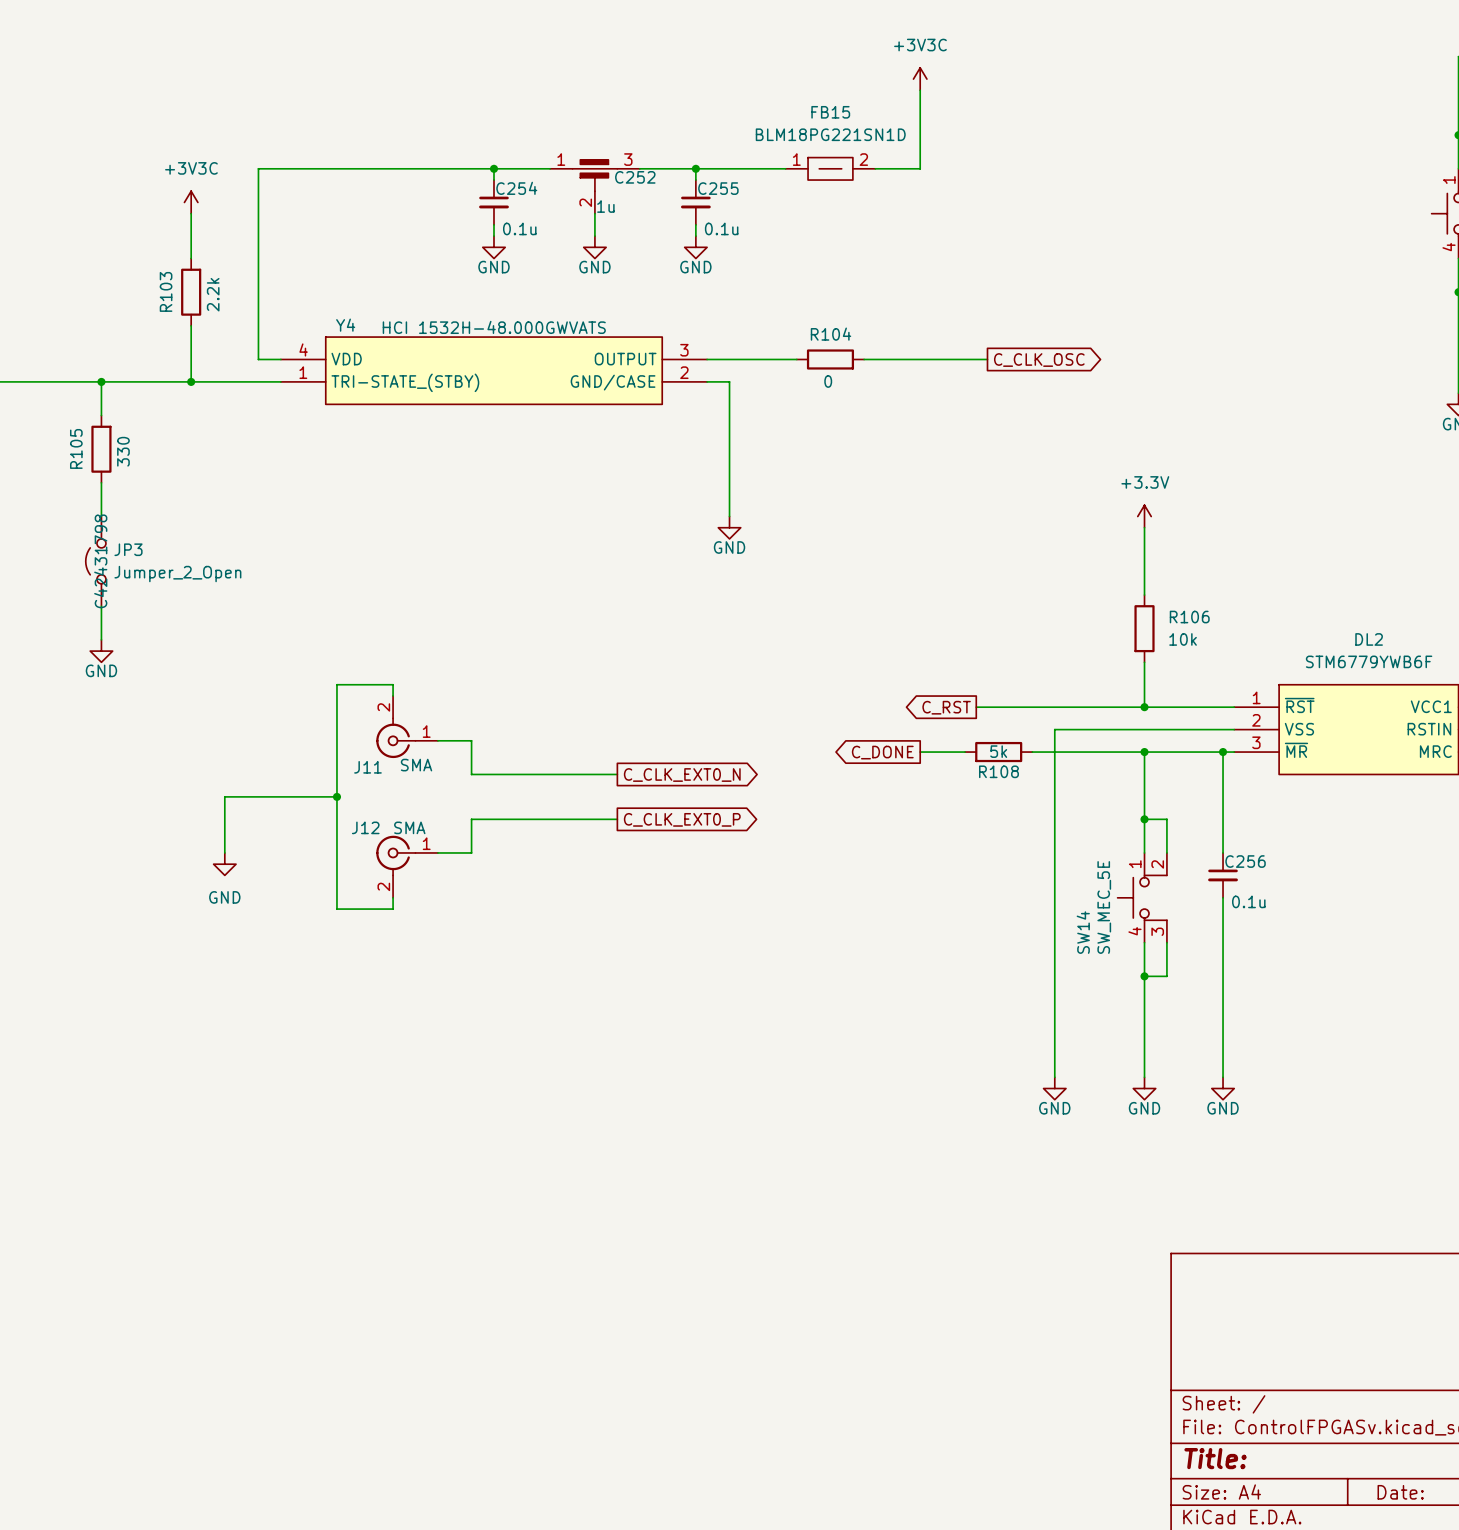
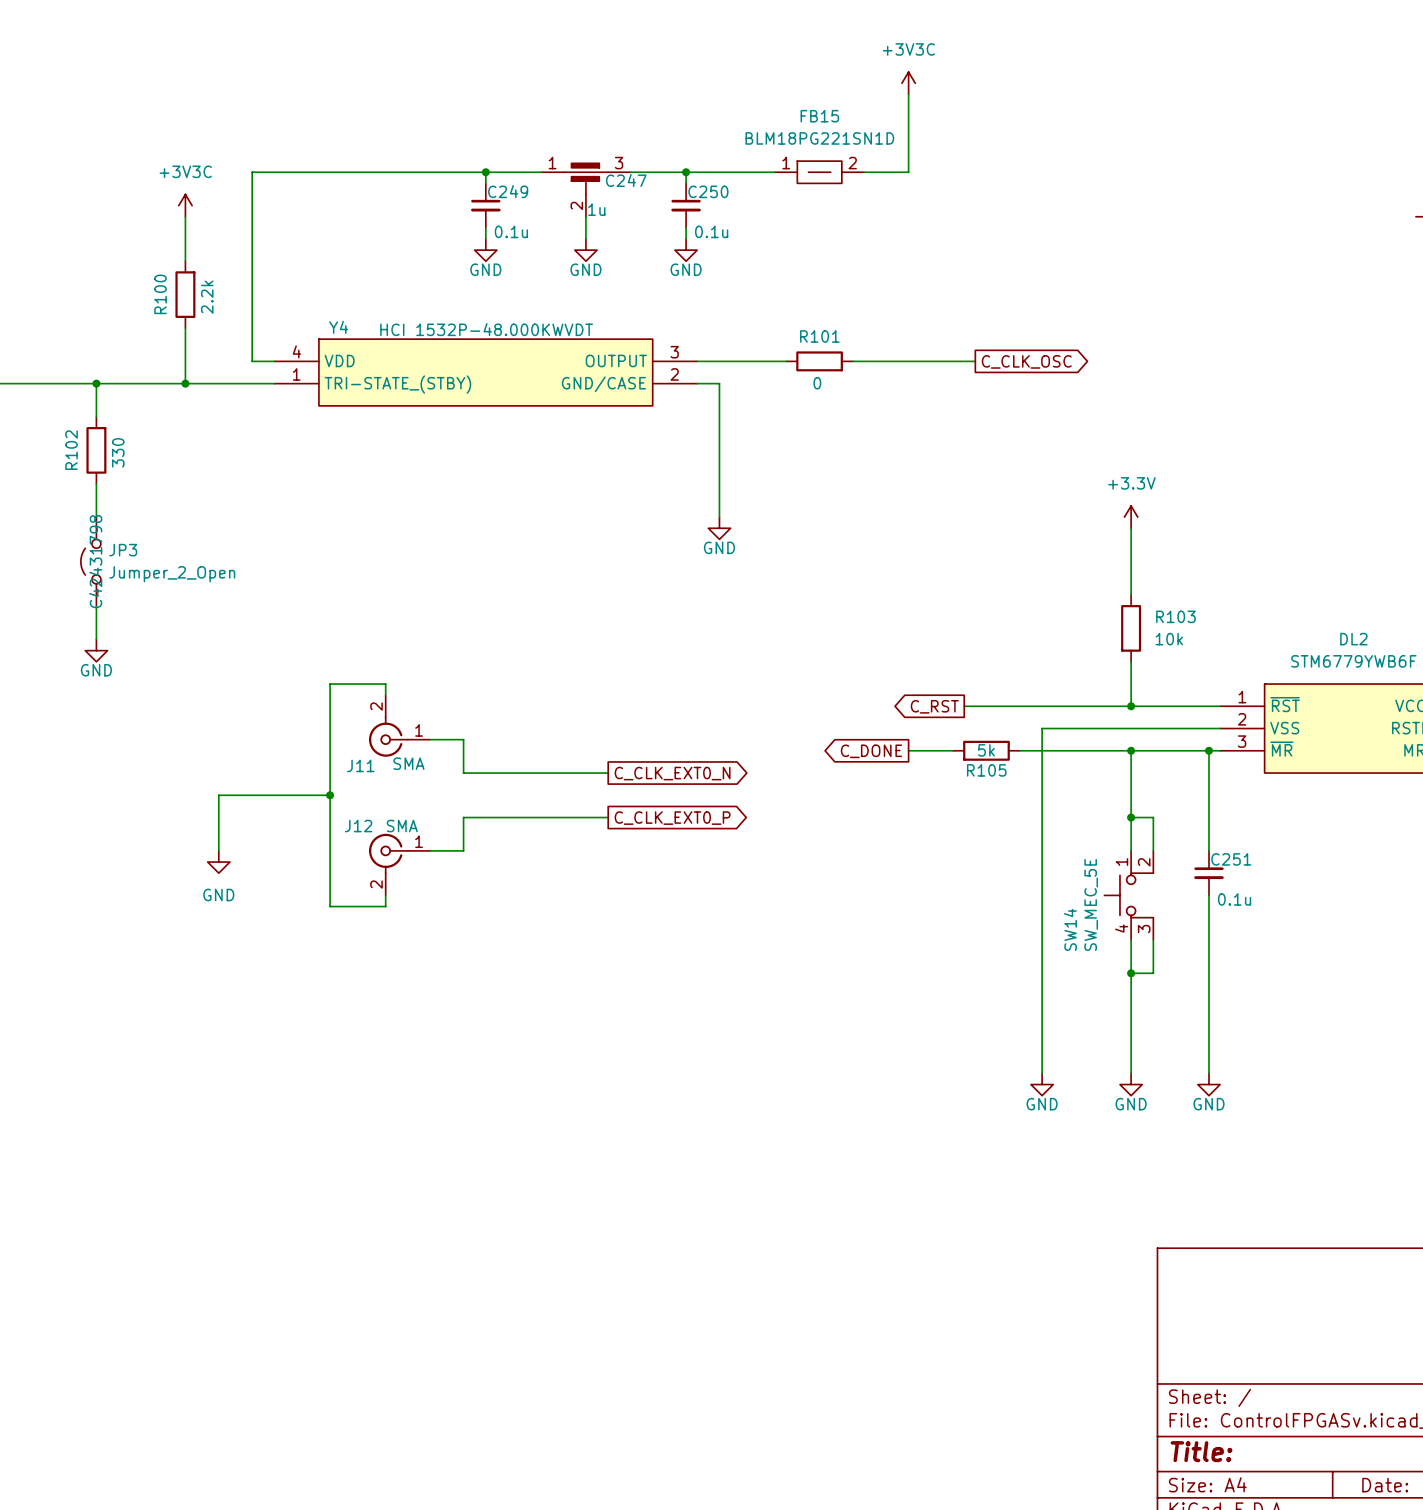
C252 name: C252 (635, 177) -> C247 (626, 180)
C254 name: C254 (516, 188) -> C249 (508, 191)
C255 name: C255 (718, 188) -> C250 (708, 191)
R103 name: R103 (166, 291) -> R100 (160, 294)
Y4 value: HCI 1532H-48.000GWVATS (494, 327) -> HCI 1532P-48.000KWVDT (486, 329)
R104 name: R104 (831, 334) -> R101 (819, 336)
R105 name: R105 (76, 448) -> R102 (71, 450)
R106 name: R106 (1189, 617) -> R103 (1175, 616)
R108 name: R108 (998, 771) -> R105 (986, 770)
C256 name: C256 (1245, 861) -> C251 (1231, 859)

